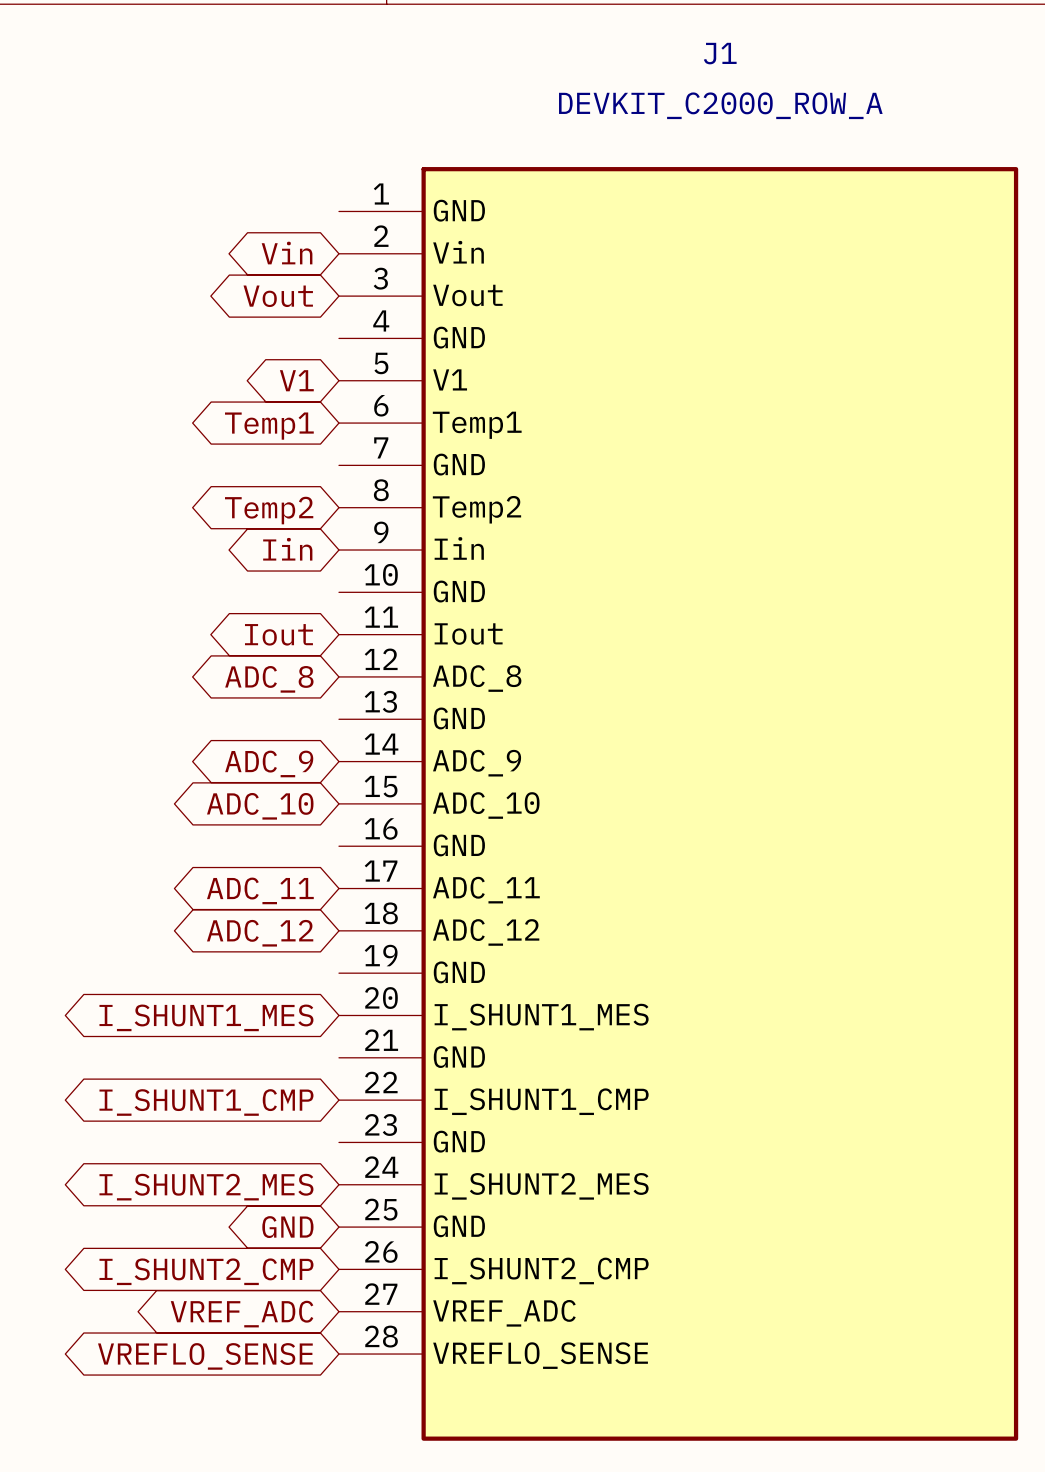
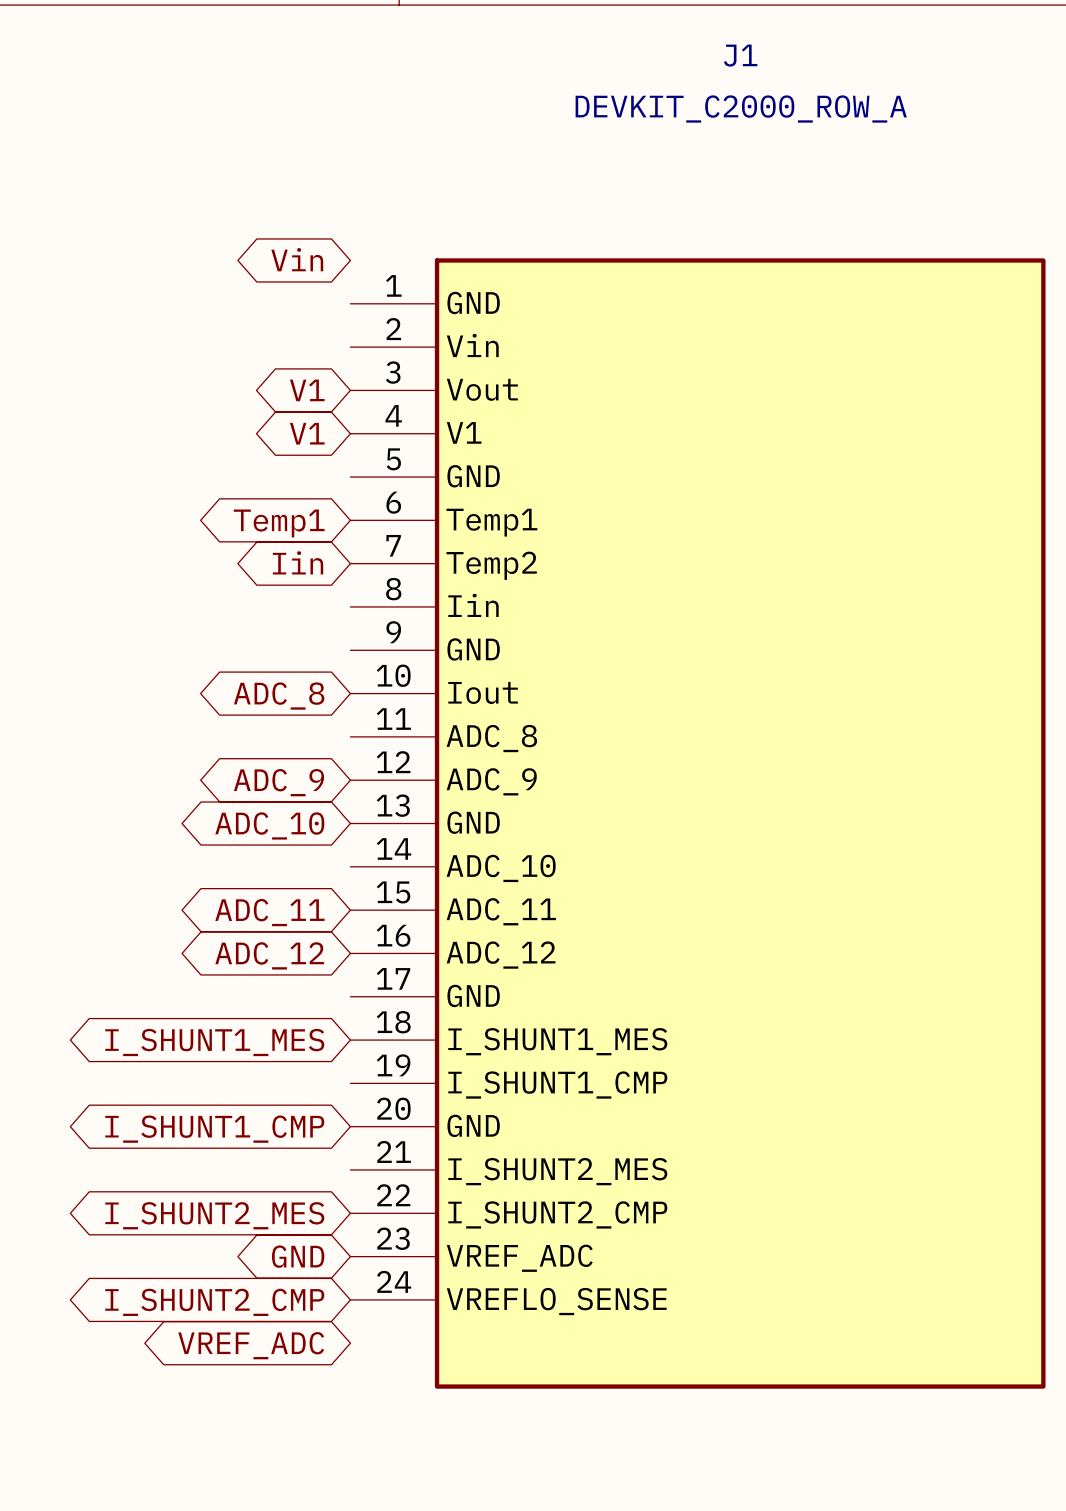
J1 symbol: [338, 167, 1019, 1441] -> [350, 258, 1046, 1389]
global label: Vout (278, 296) -> none
global label: Temp1 (269, 426) -> V1 (307, 433)
global label: Temp2 (269, 510) -> Temp1 (279, 523)
global label: Iout (278, 634) -> none
global label: VREFLO_SENSE (205, 1356) -> none

